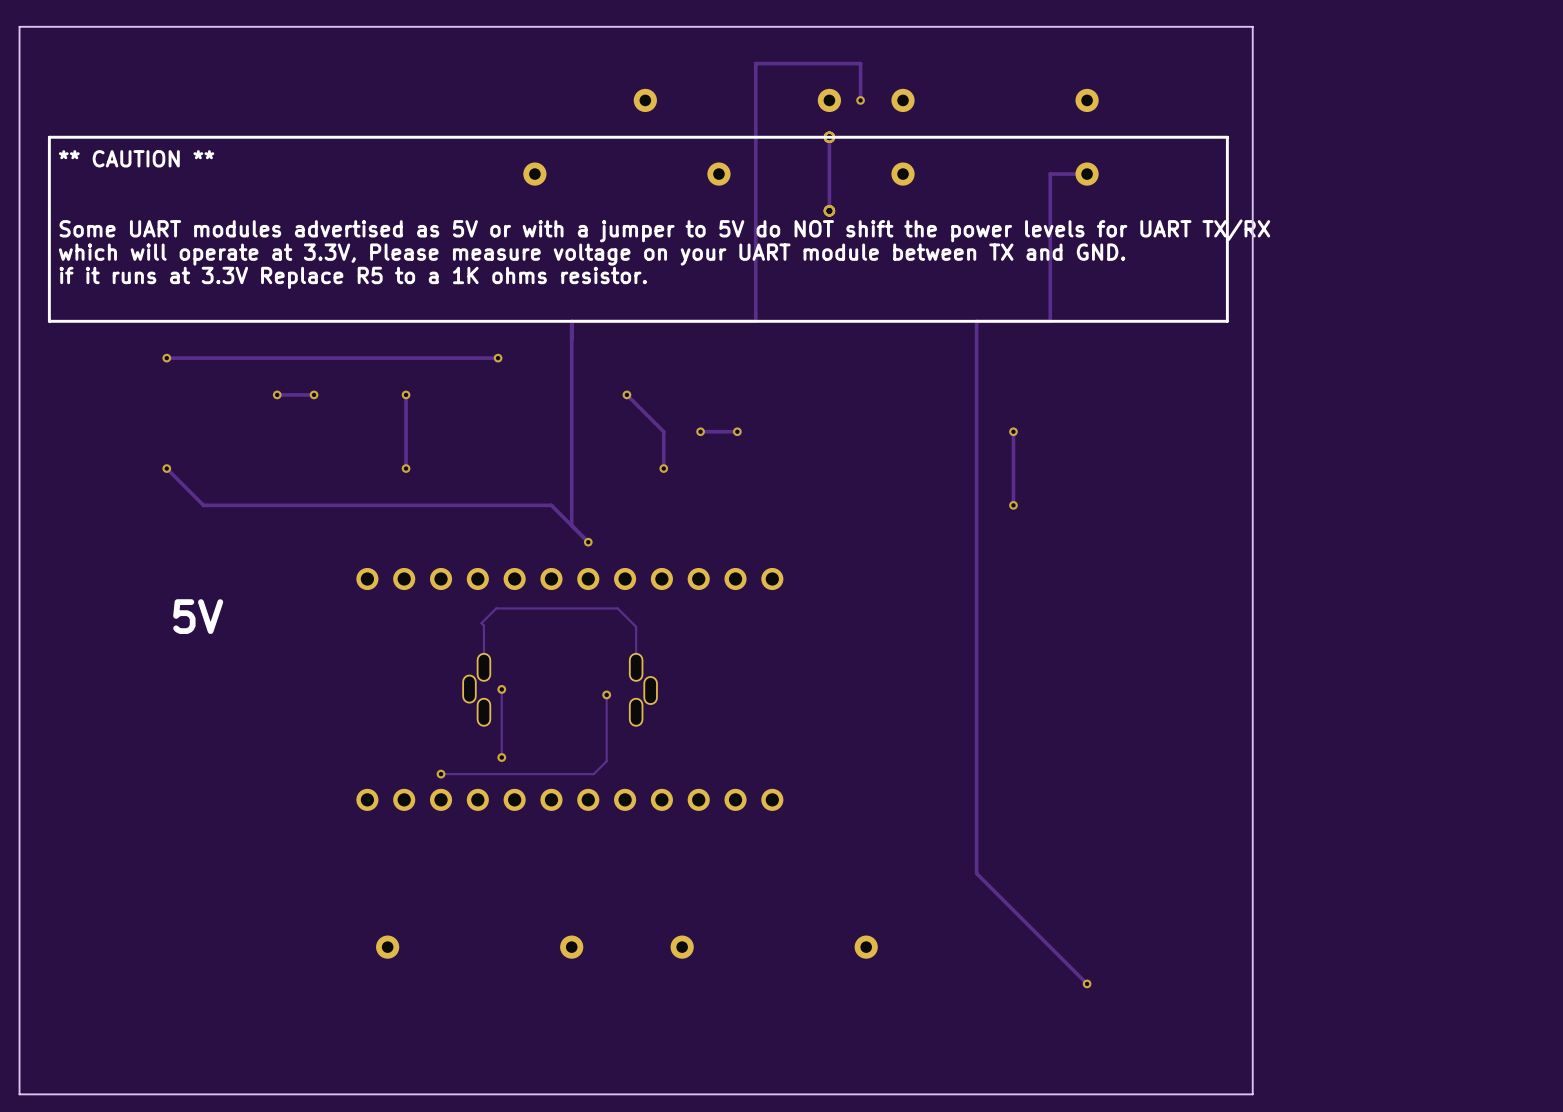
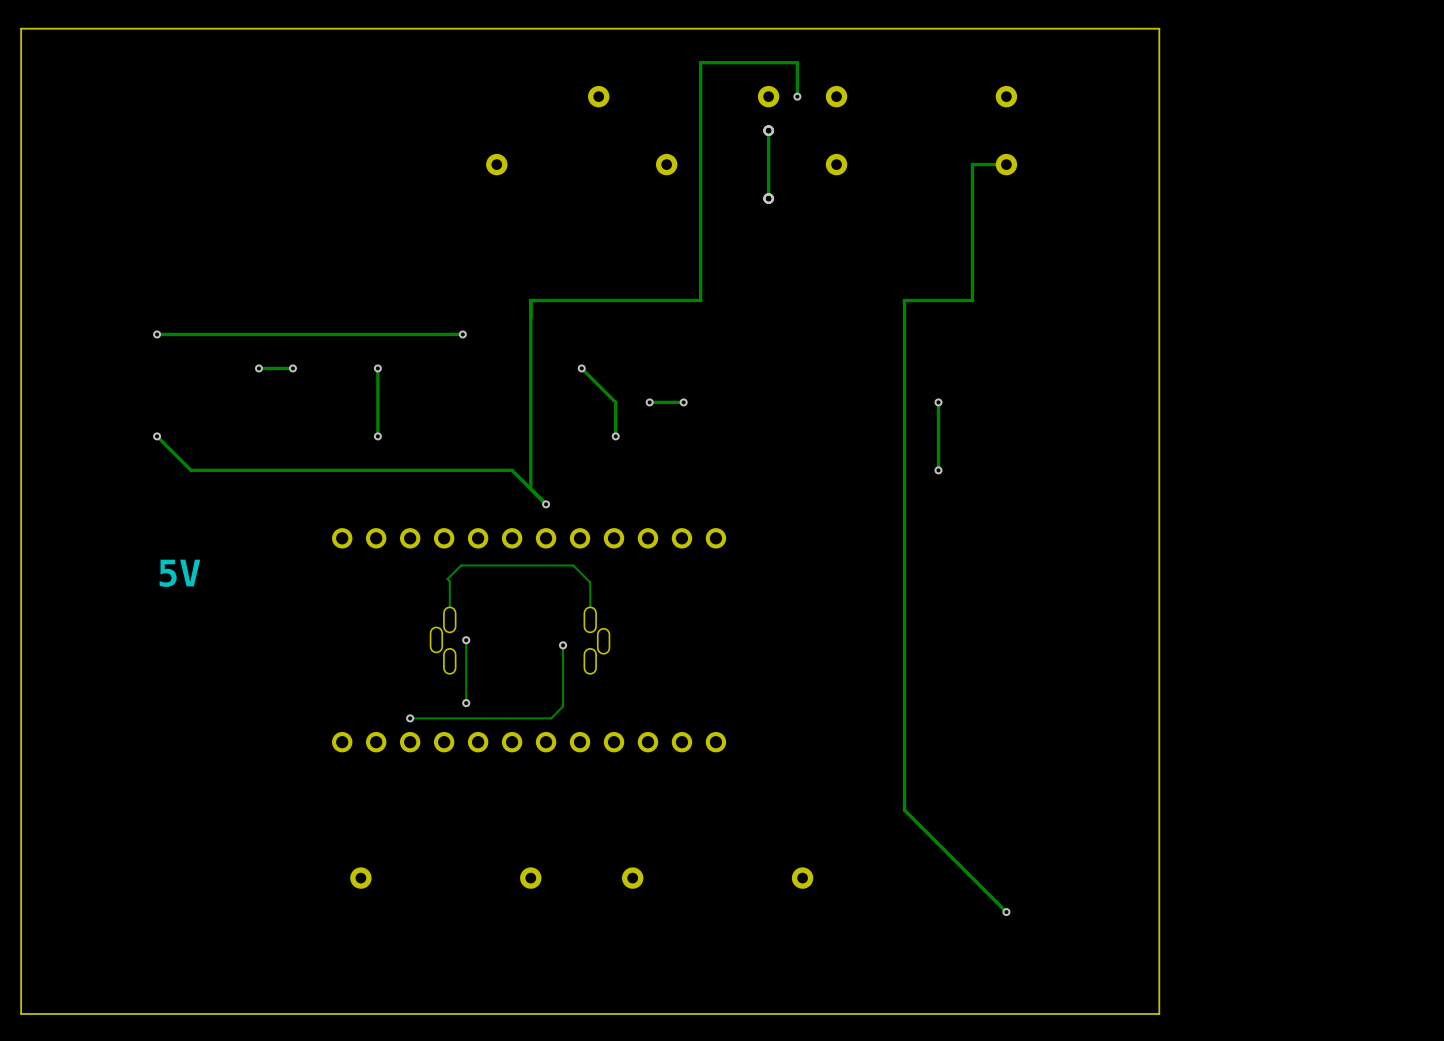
line: (1227, 137) (49, 137) (49, 321) (1227, 321) (1227, 137) -> none
text: ** CAUTION ** (136, 158) -> none
text: Some UART modules advertised as 5V or with a jumper to 5V do NOT shift the power levels for UART TX/RX (664, 230) -> none
text: which will operate at 3.3V, Please measure voltage on your UART module between TX and GND. (592, 254) -> none
text: if it runs at 3.3V Replace R5 to a 1K ohms resistor. (353, 277) -> none

